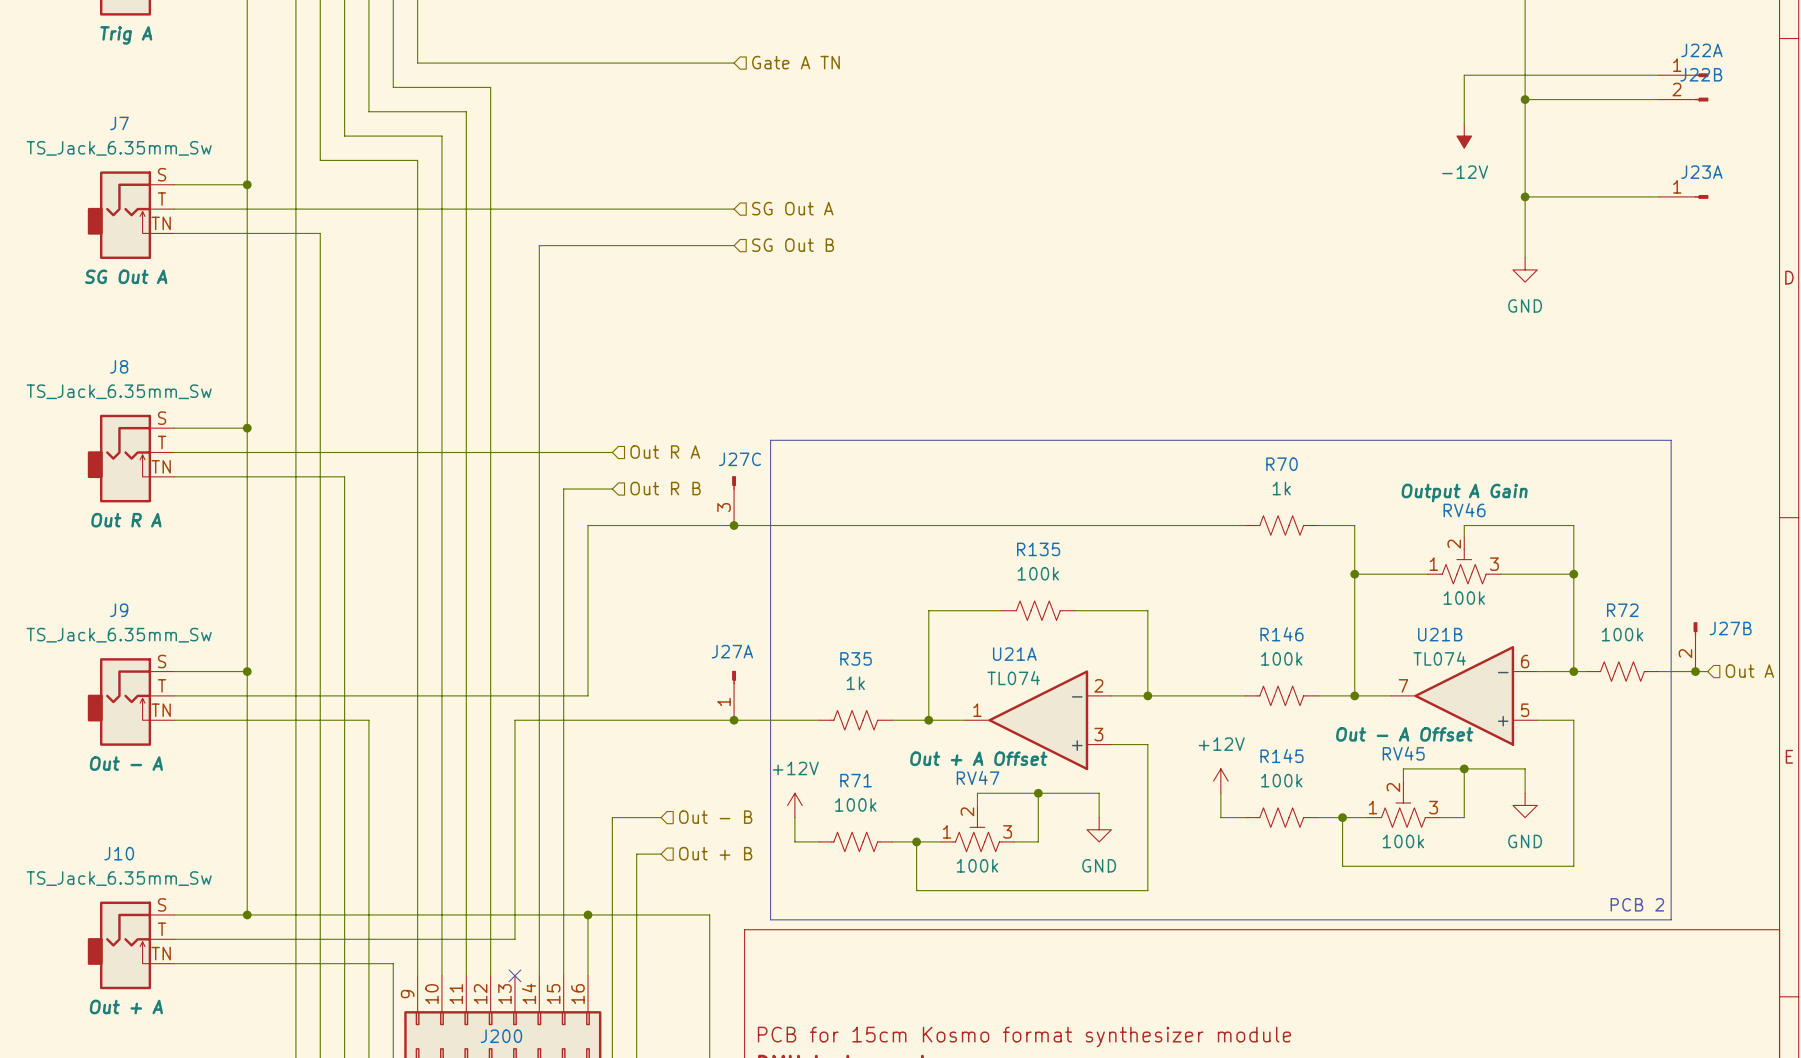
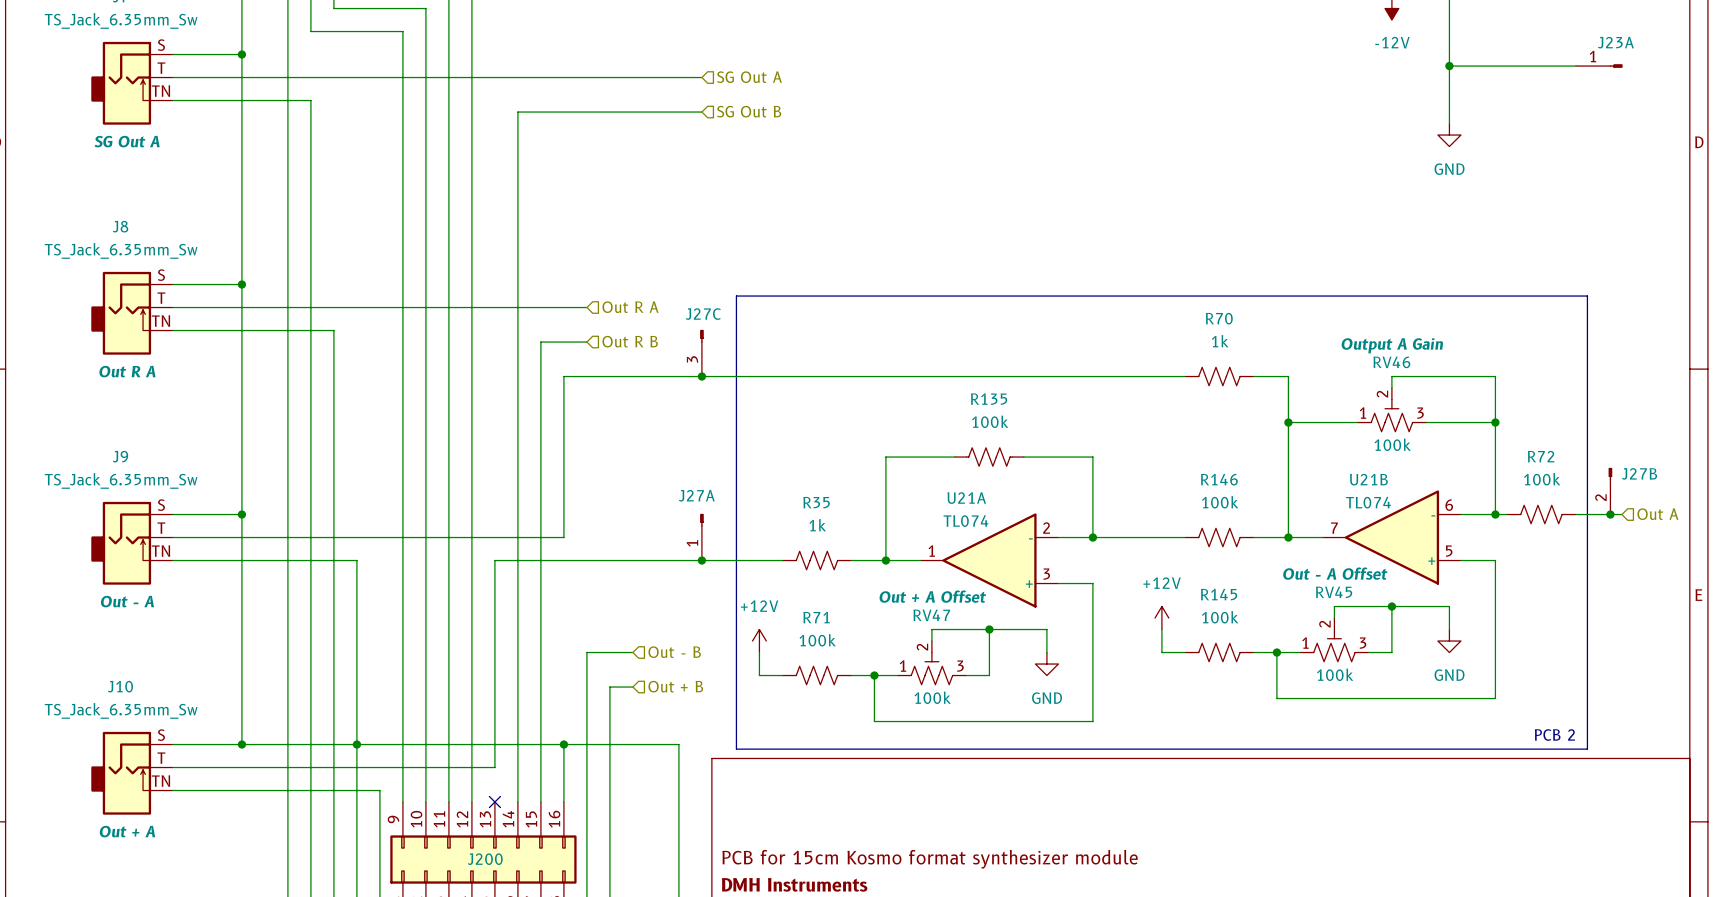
junction: none -> (356, 744)

